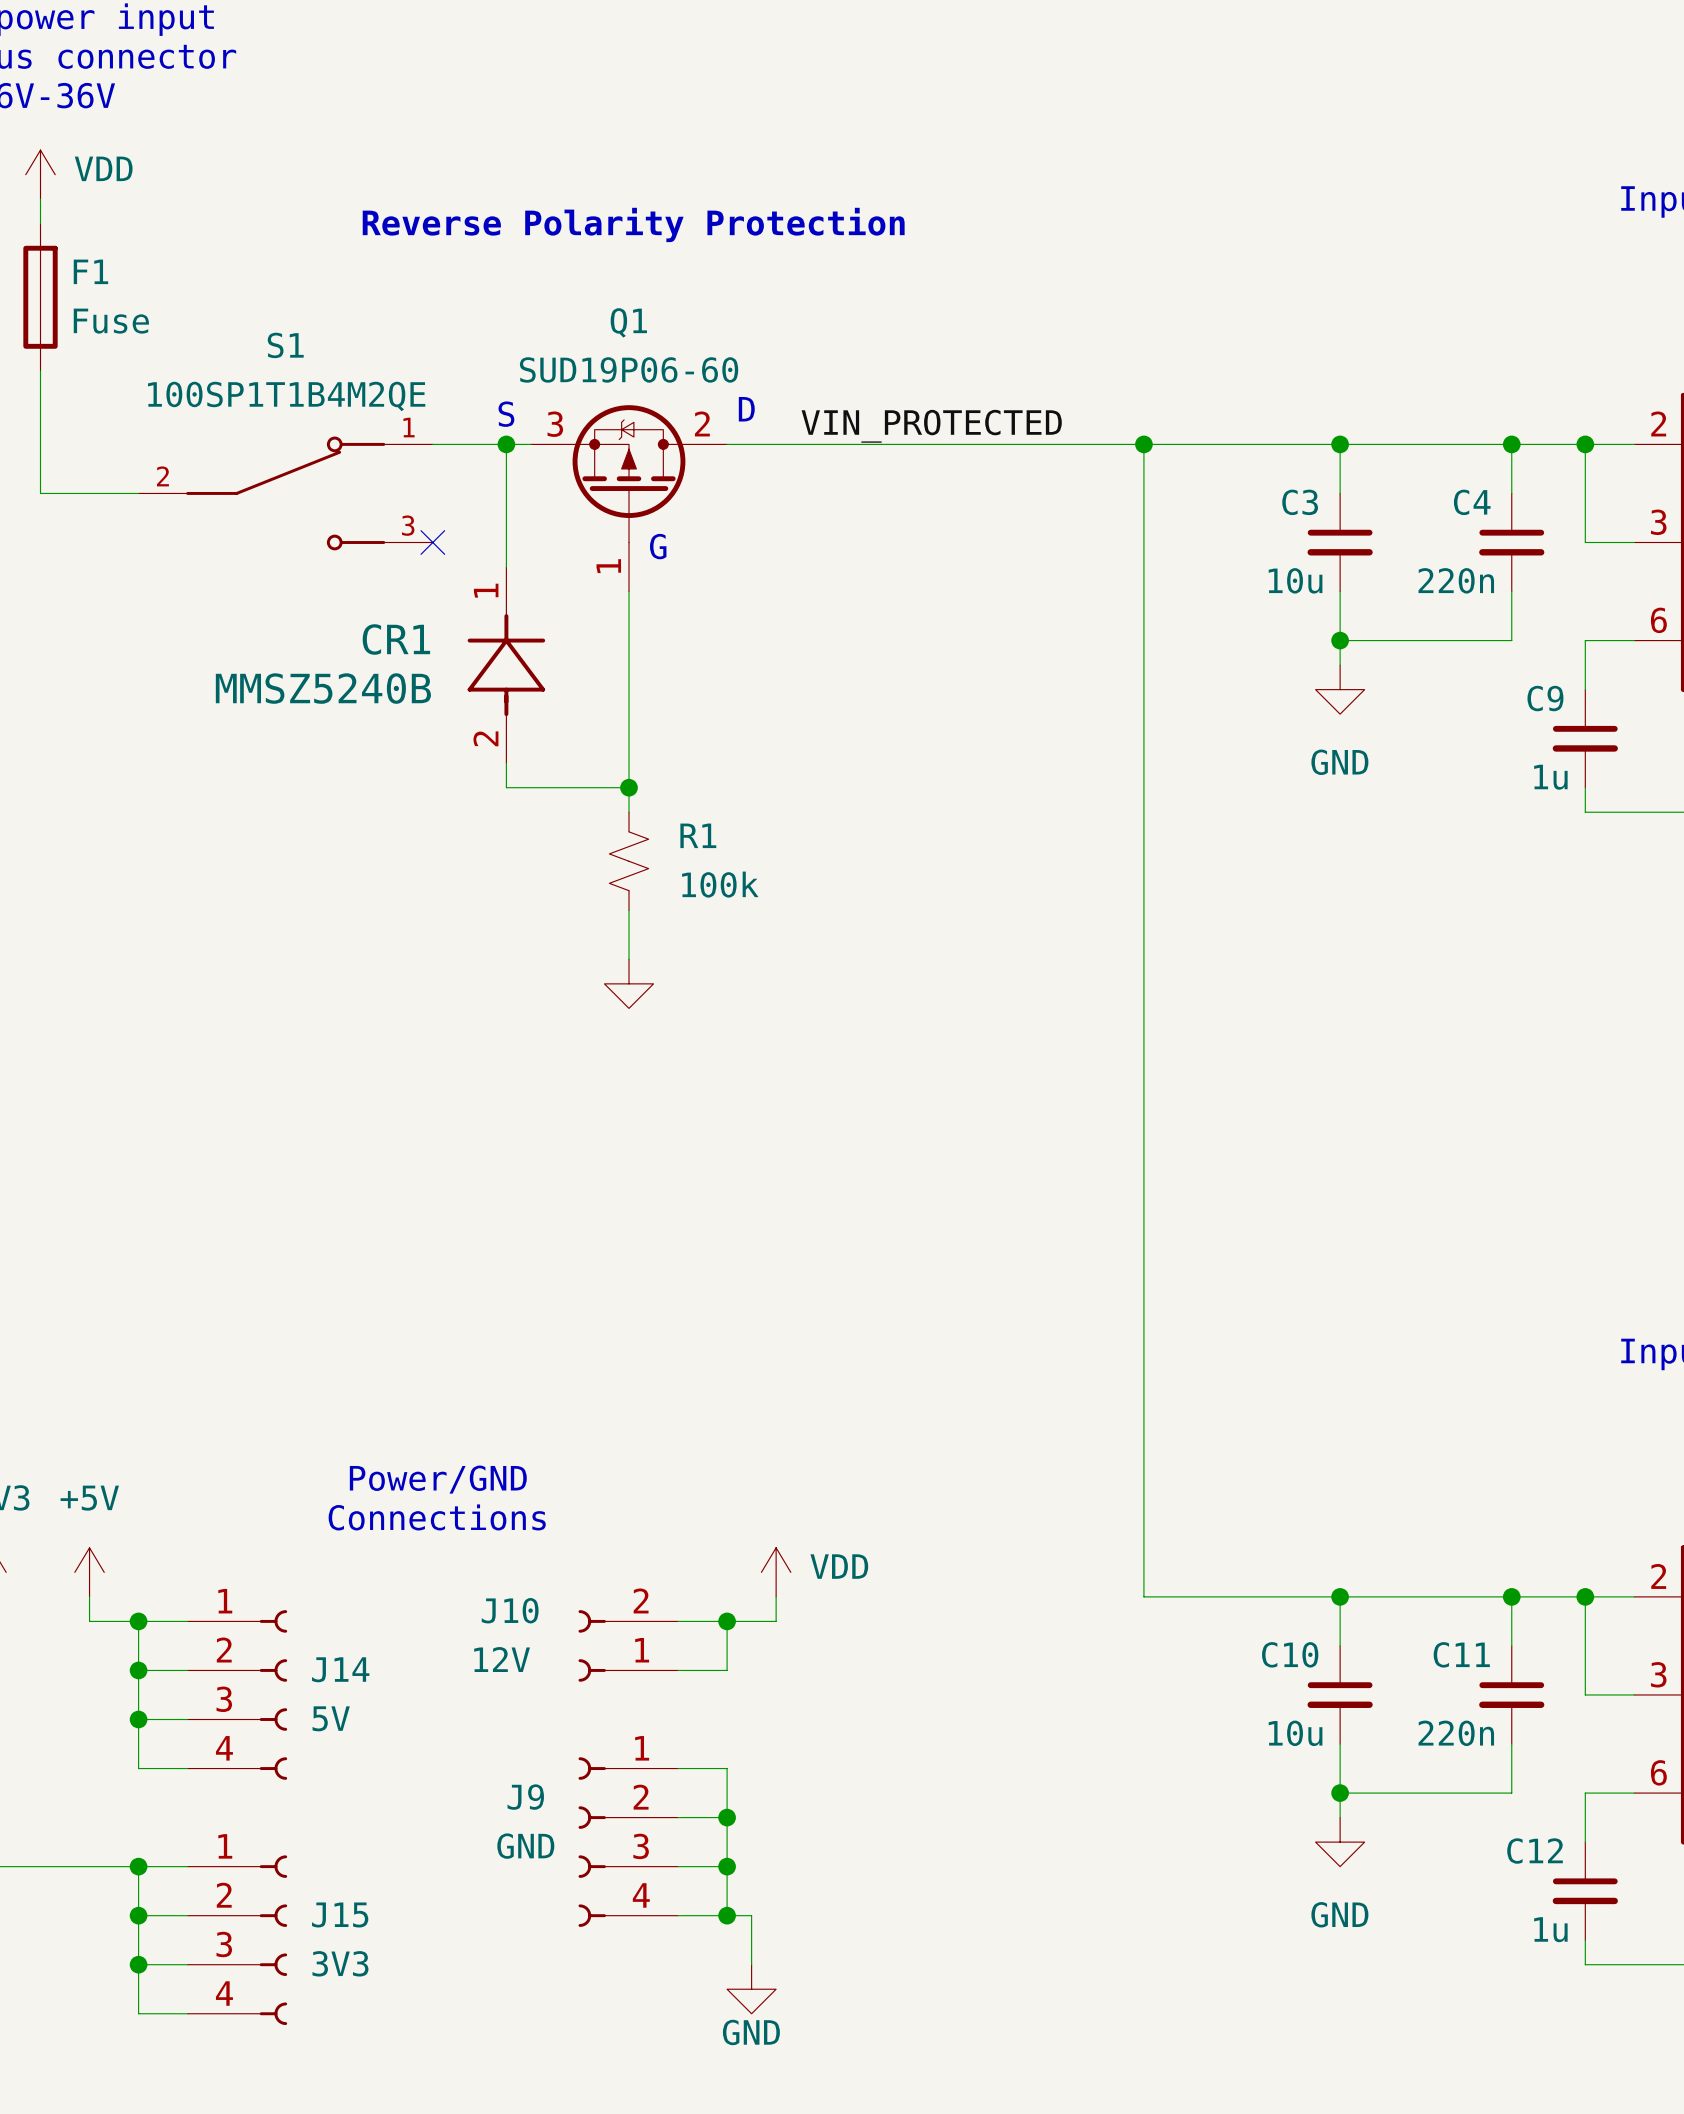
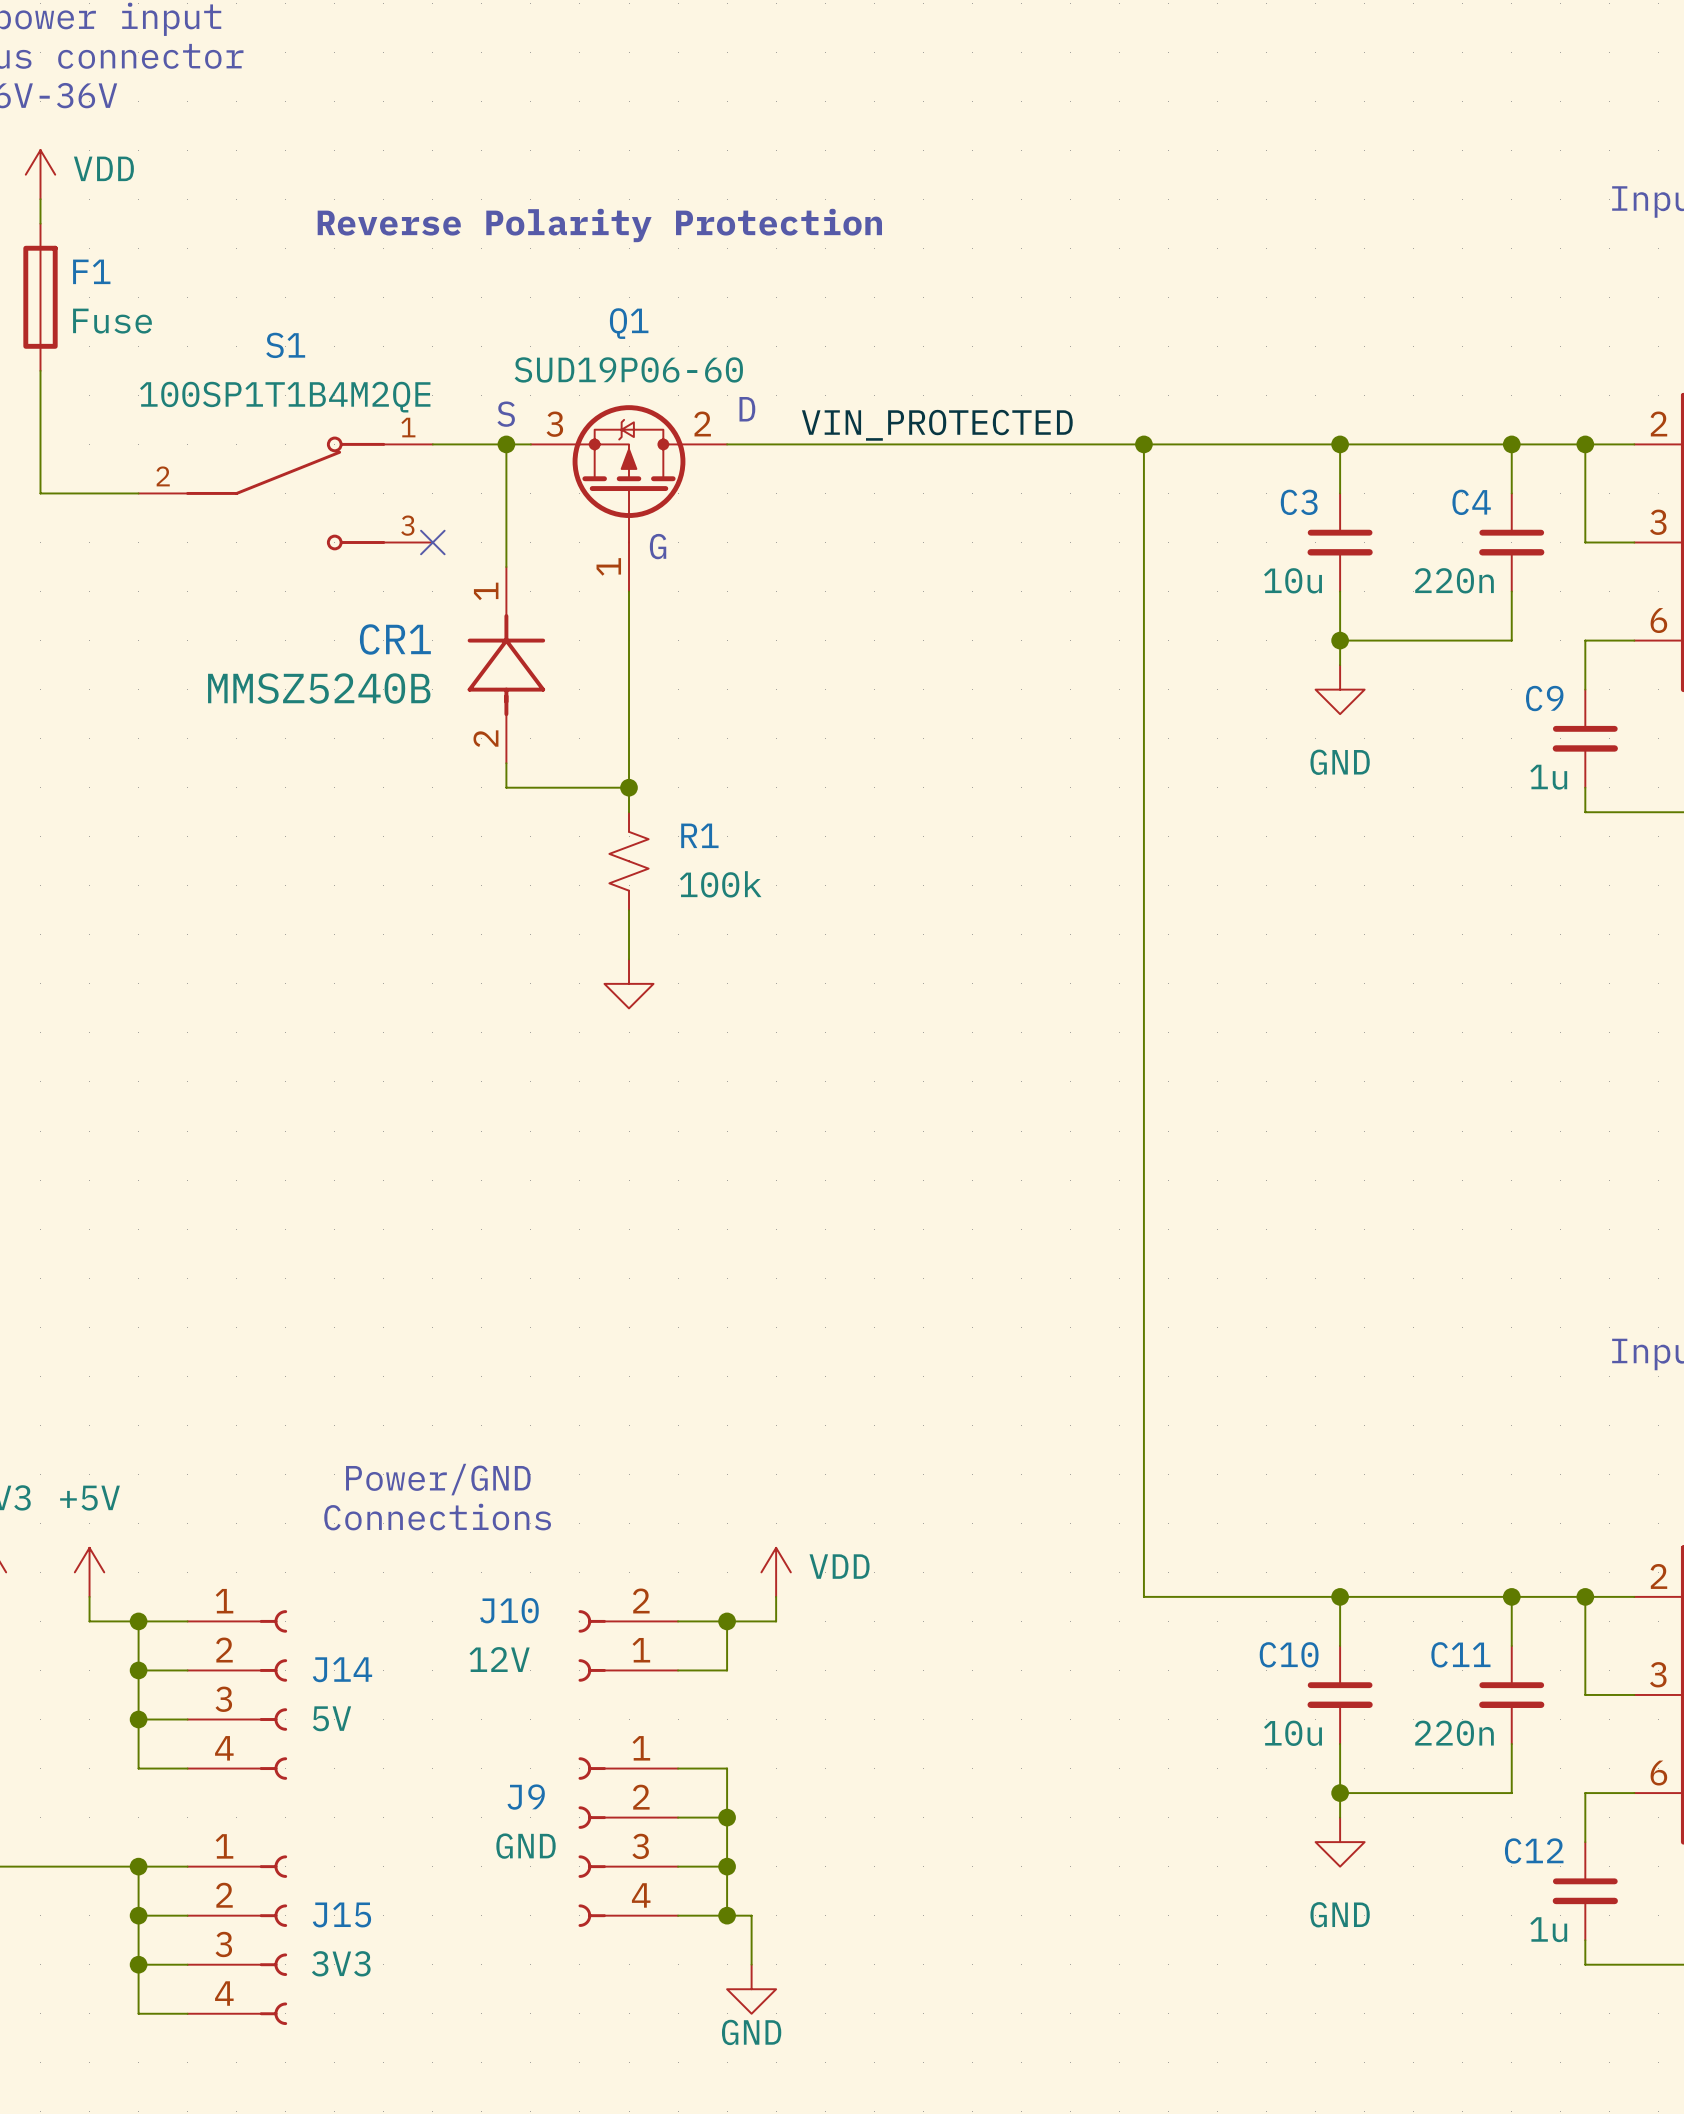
text position: Reverse Polarity Protection (633, 224) -> Reverse Polarity Protection (599, 225)

